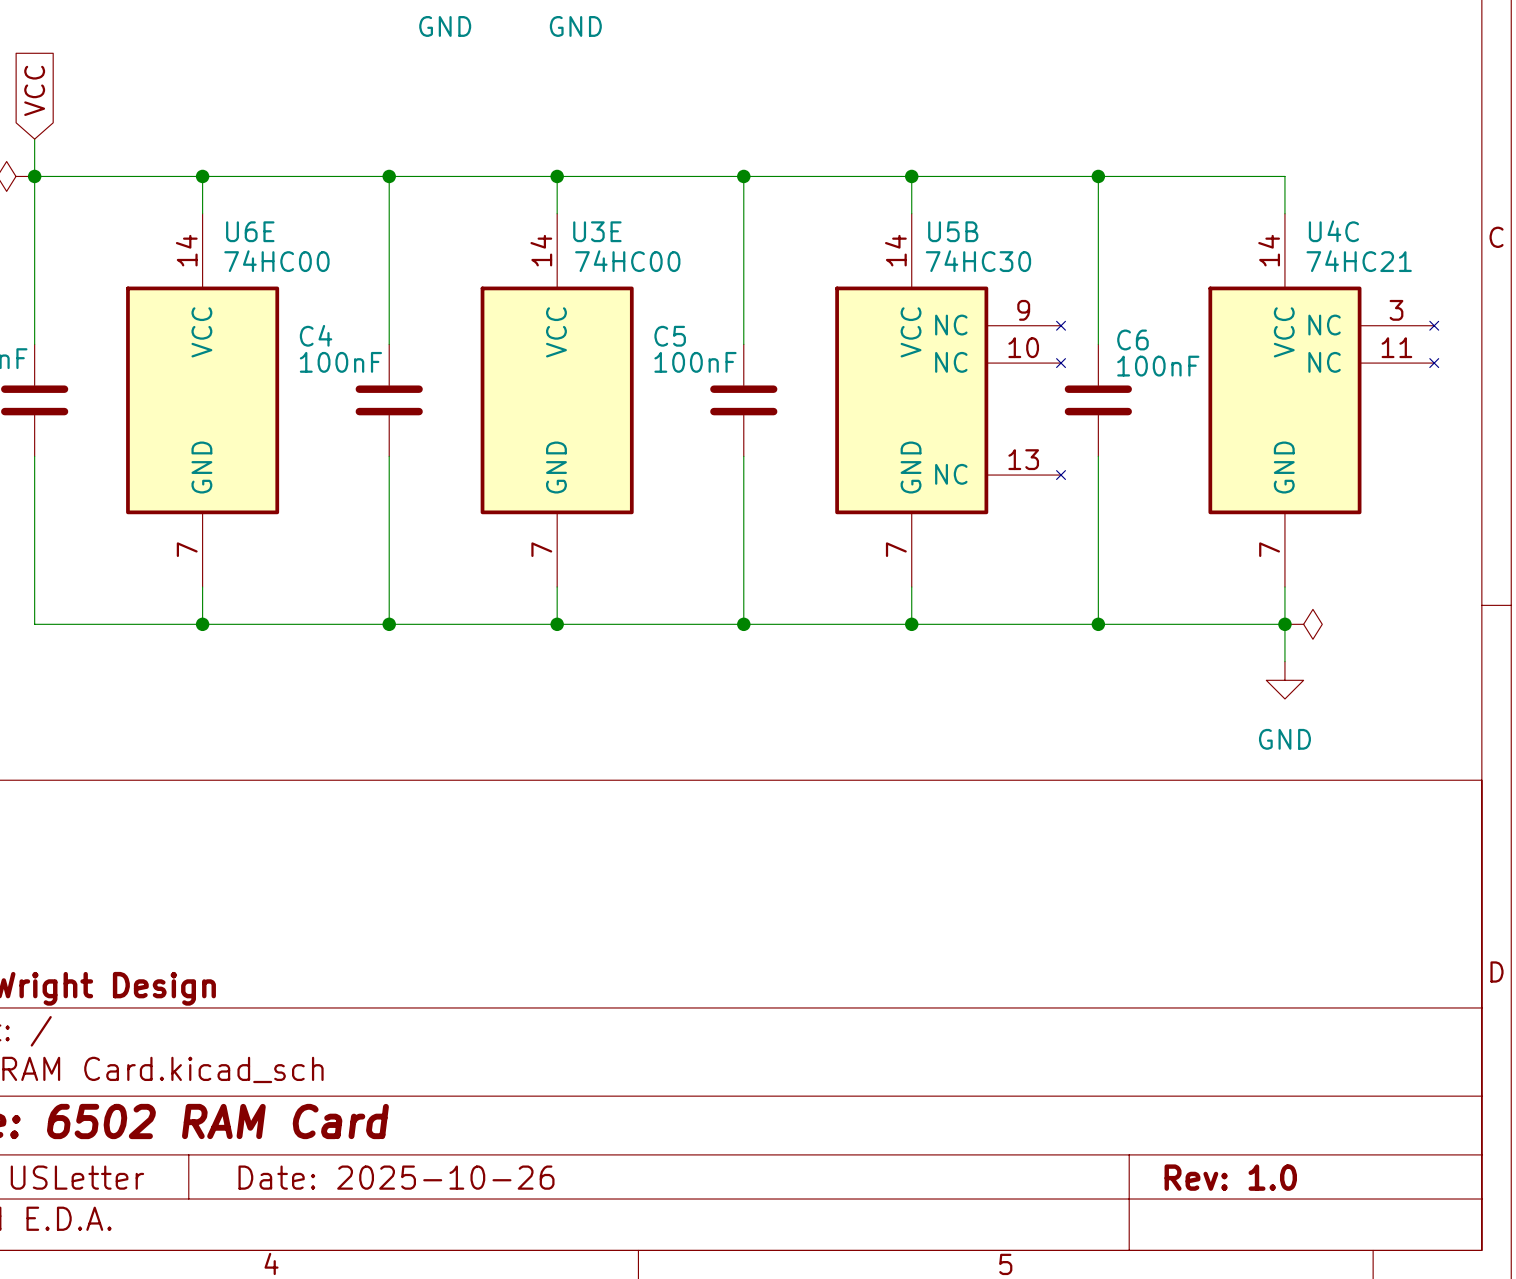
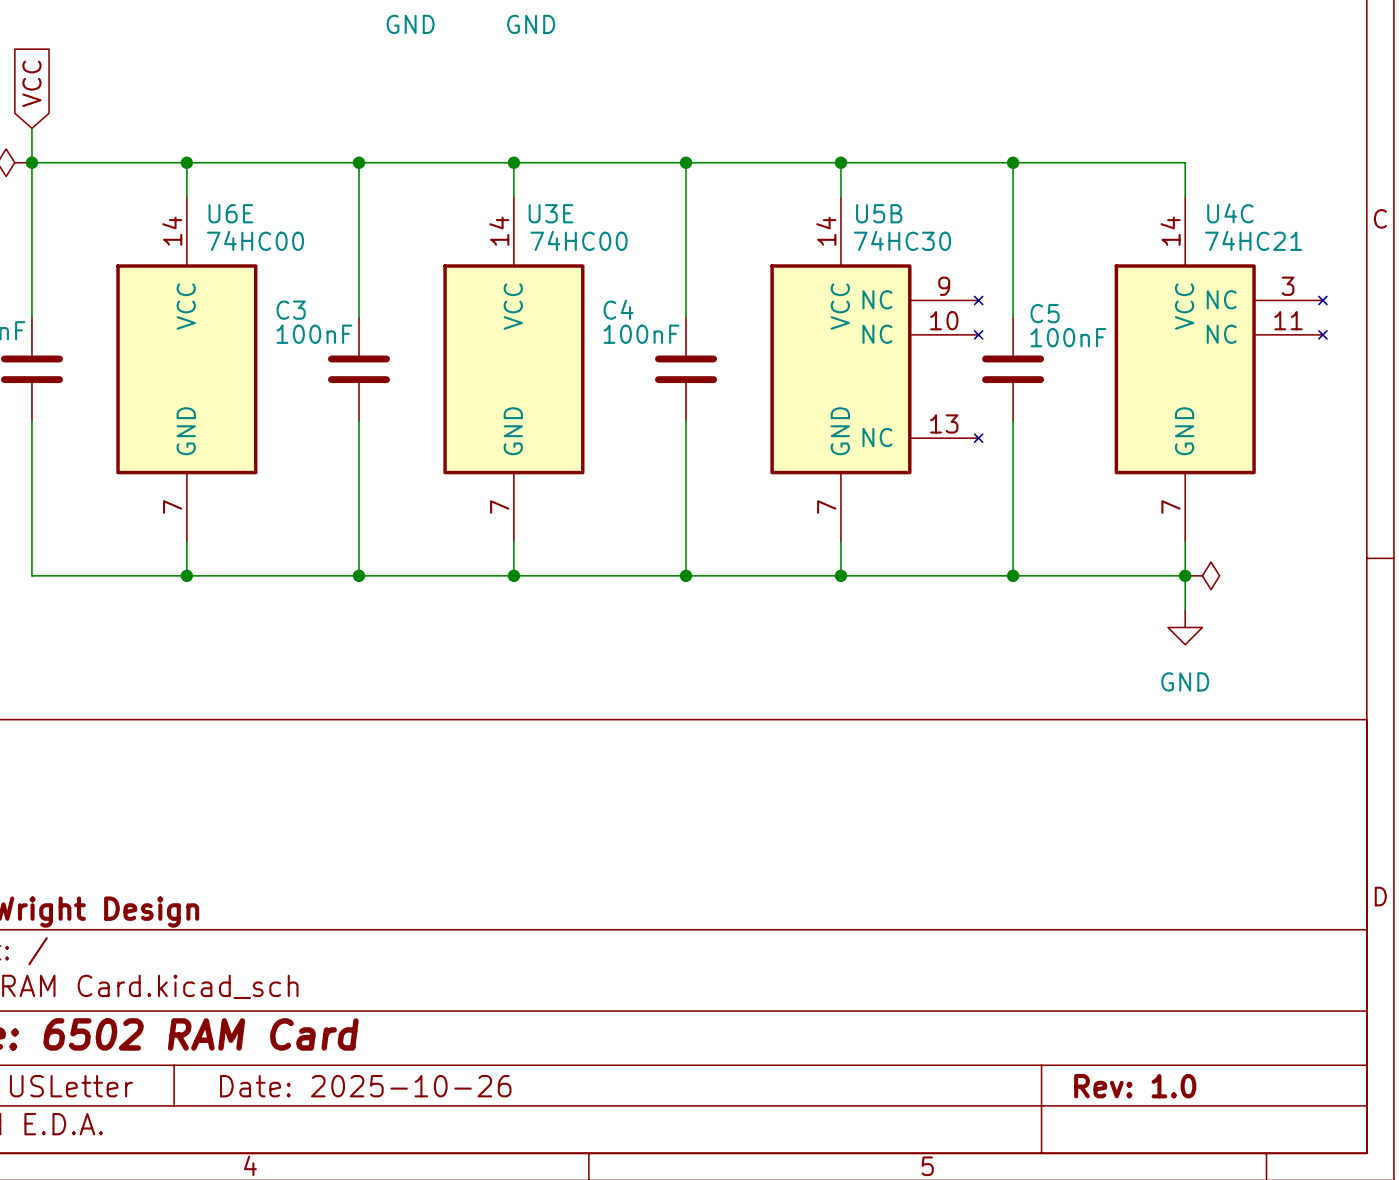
C4 name: C4 (316, 335) -> C3 (291, 310)
C5 name: C5 (670, 336) -> C4 (618, 309)
C6 name: C6 (1132, 339) -> C5 (1045, 313)

